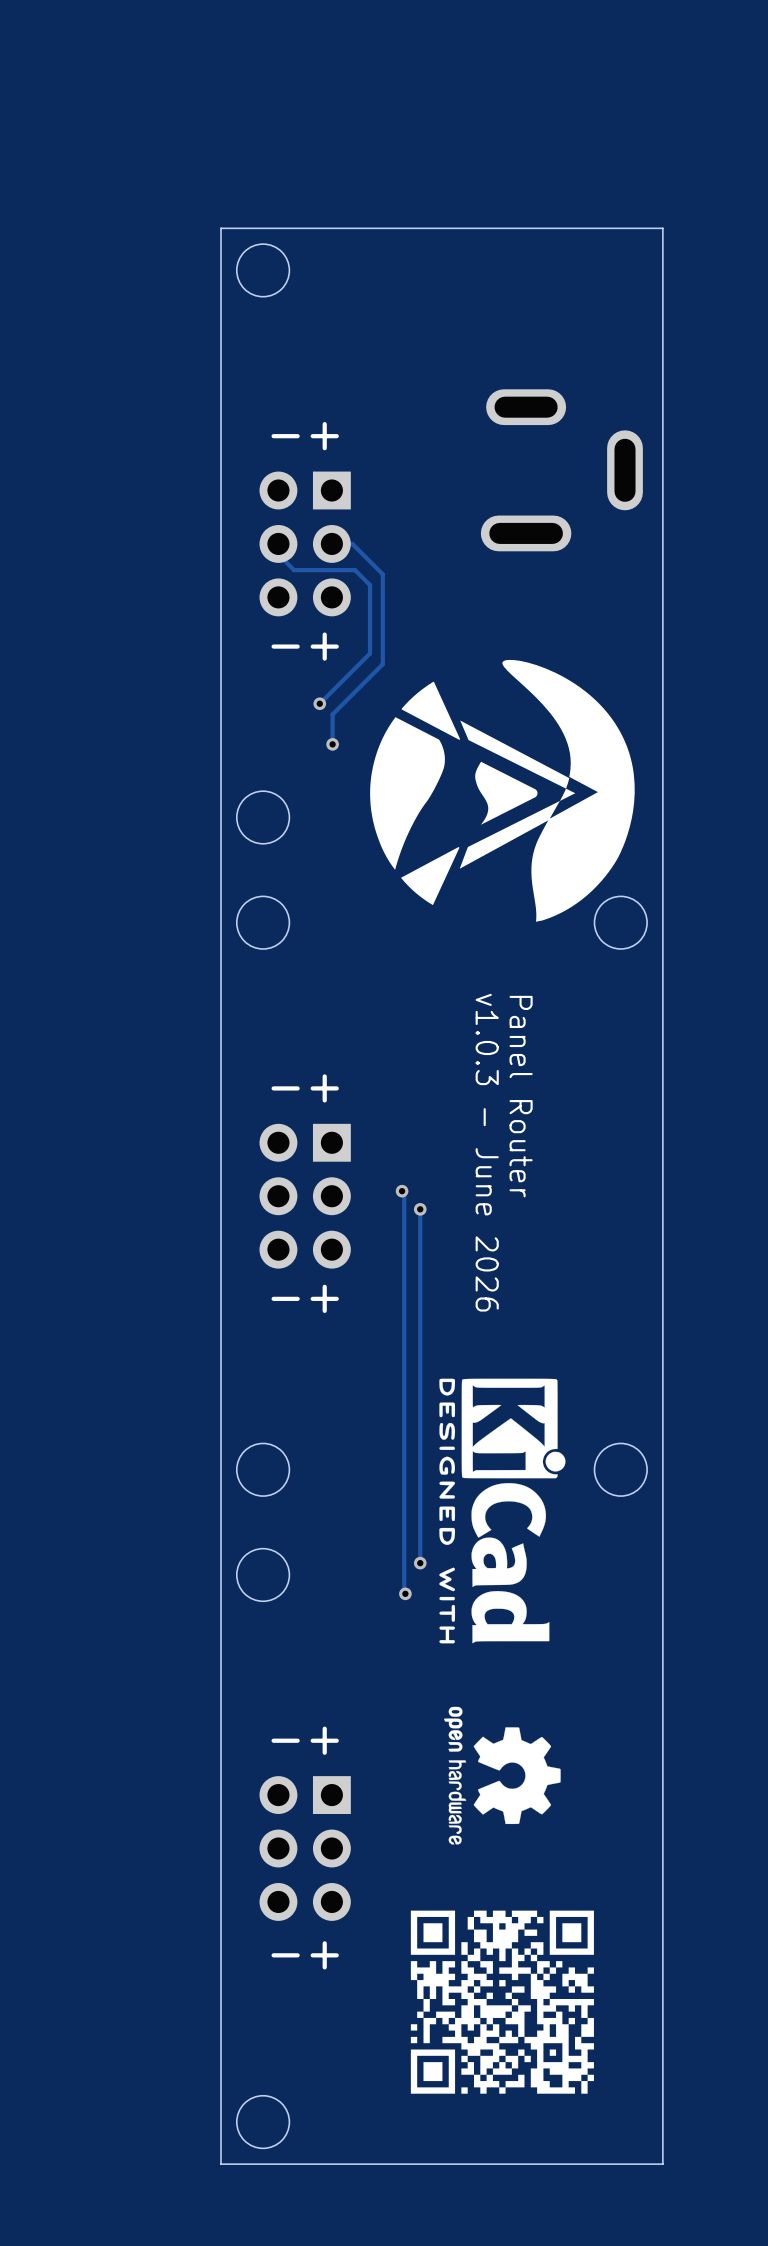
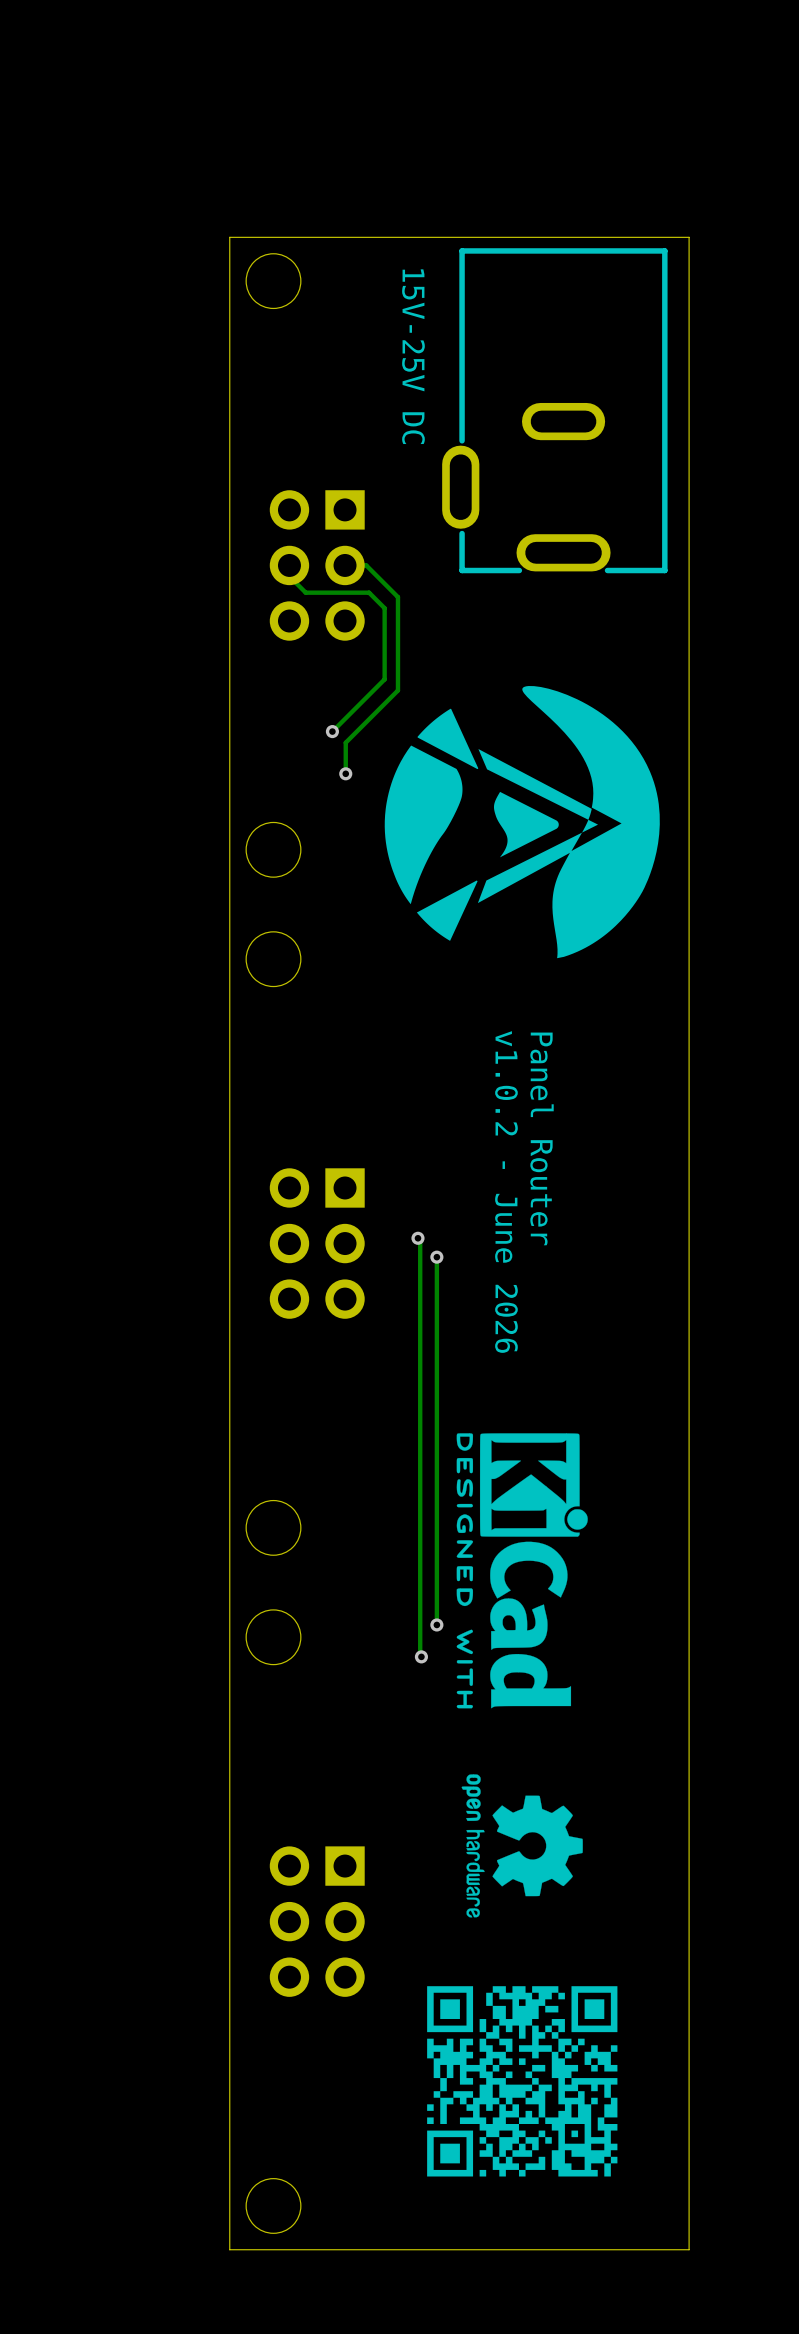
text: +- (305, 436) -> none
15V-25V DC side: top (561, 470) -> bottom (554, 410)
text: +- (305, 646) -> none
round board edge: [593, 895, 648, 950] -> none
text: +- (305, 1088) -> none
text: v1.0.3 - June 2026 (487, 1152) -> v1.0.2 - June 2026 (506, 1192)
text: +- (305, 1298) -> none
round board edge: [593, 1442, 648, 1497] -> none
text: +- (305, 1740) -> none
text: +- (305, 1955) -> none

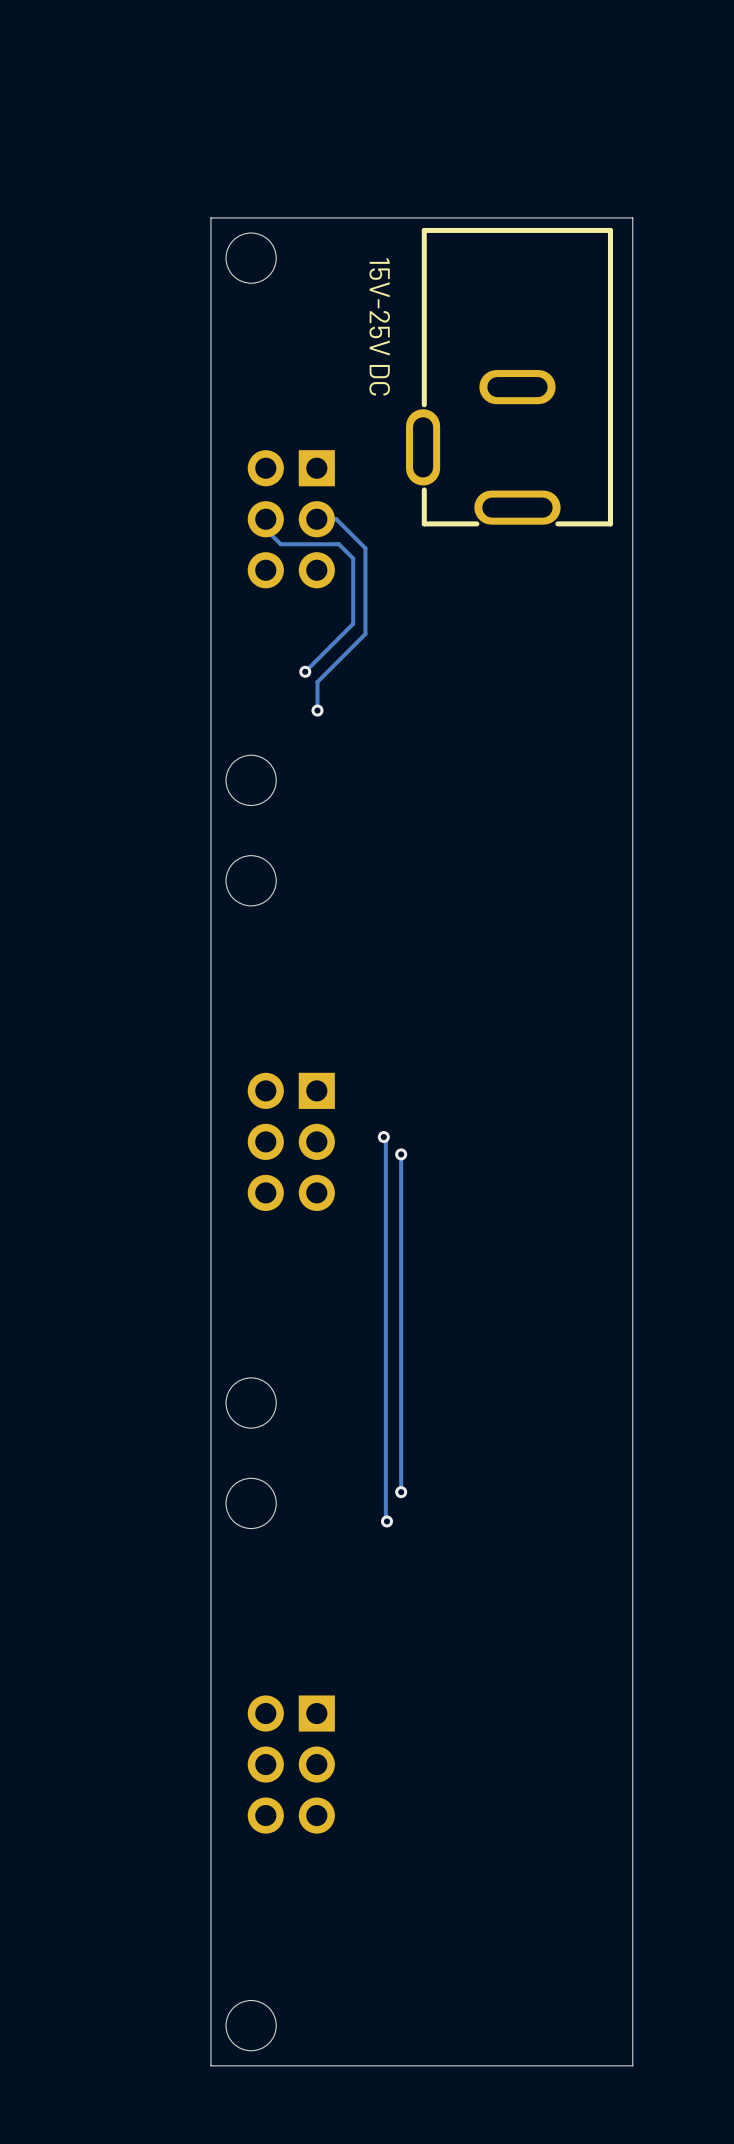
drawing: [384, 686, 660, 959] -> none
text: Panel Router (542, 1138) -> none
text: v1.0.2 - June 2026 (506, 1192) -> none
drawing: [456, 1433, 588, 1709] -> none
drawing: [461, 1774, 583, 1918] -> none
drawing: [427, 1986, 618, 2177] -> none

